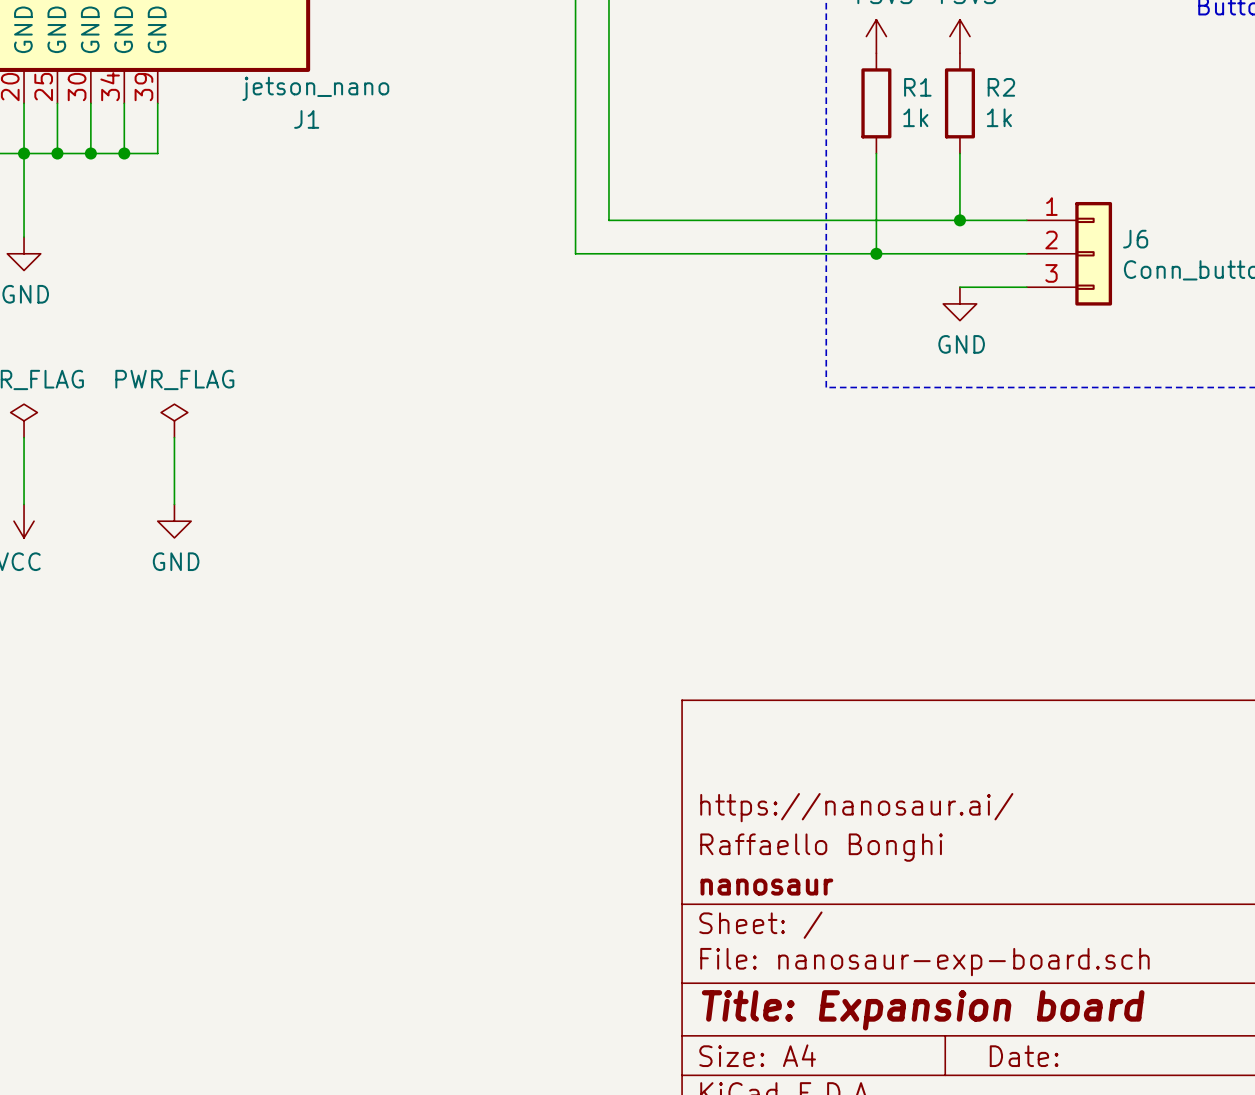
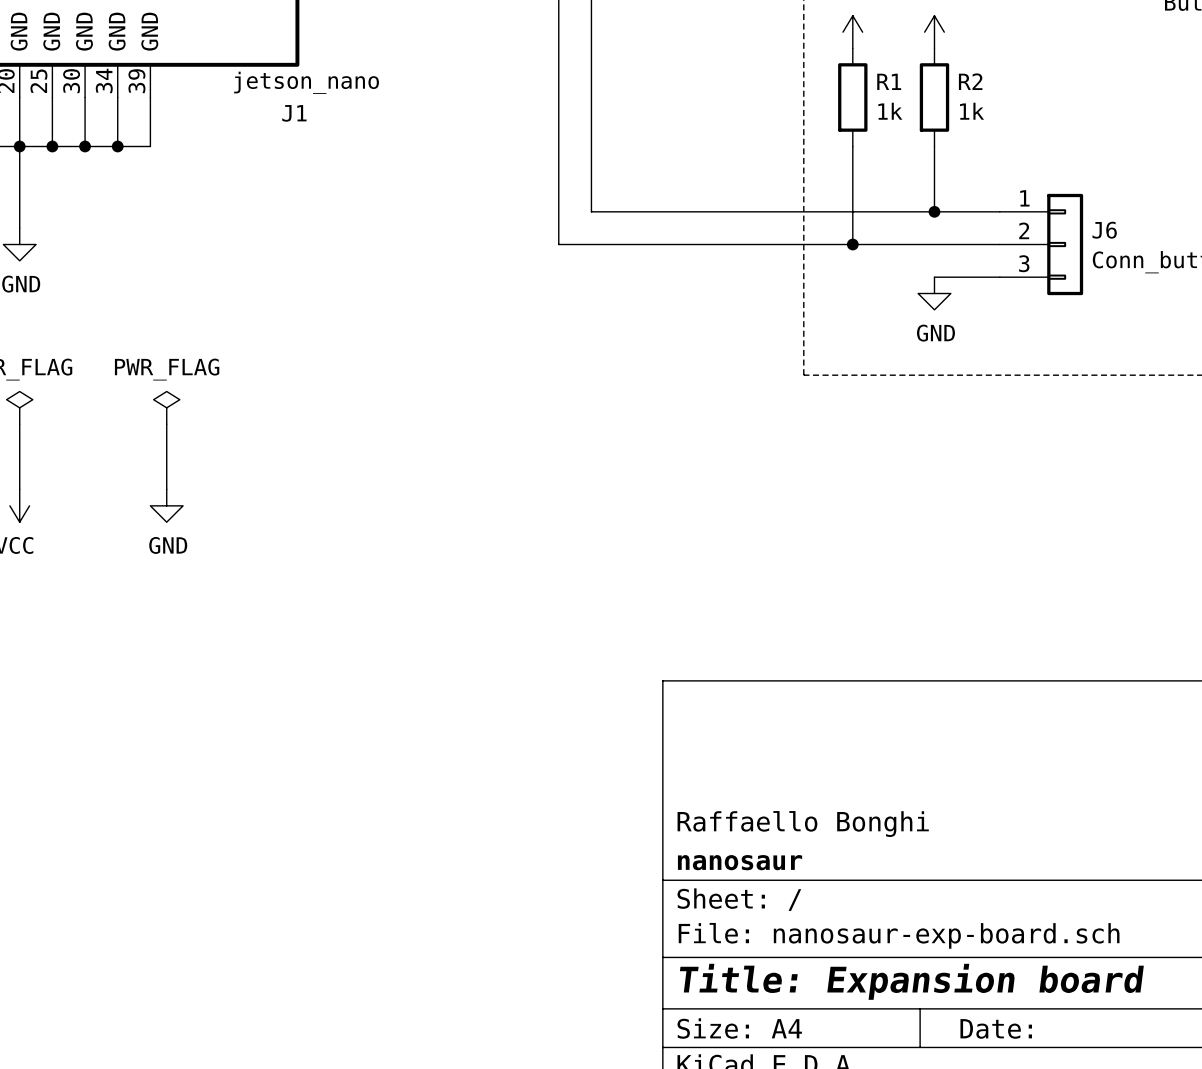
title block: https://nanosaur.ai/ (856, 807) -> none

